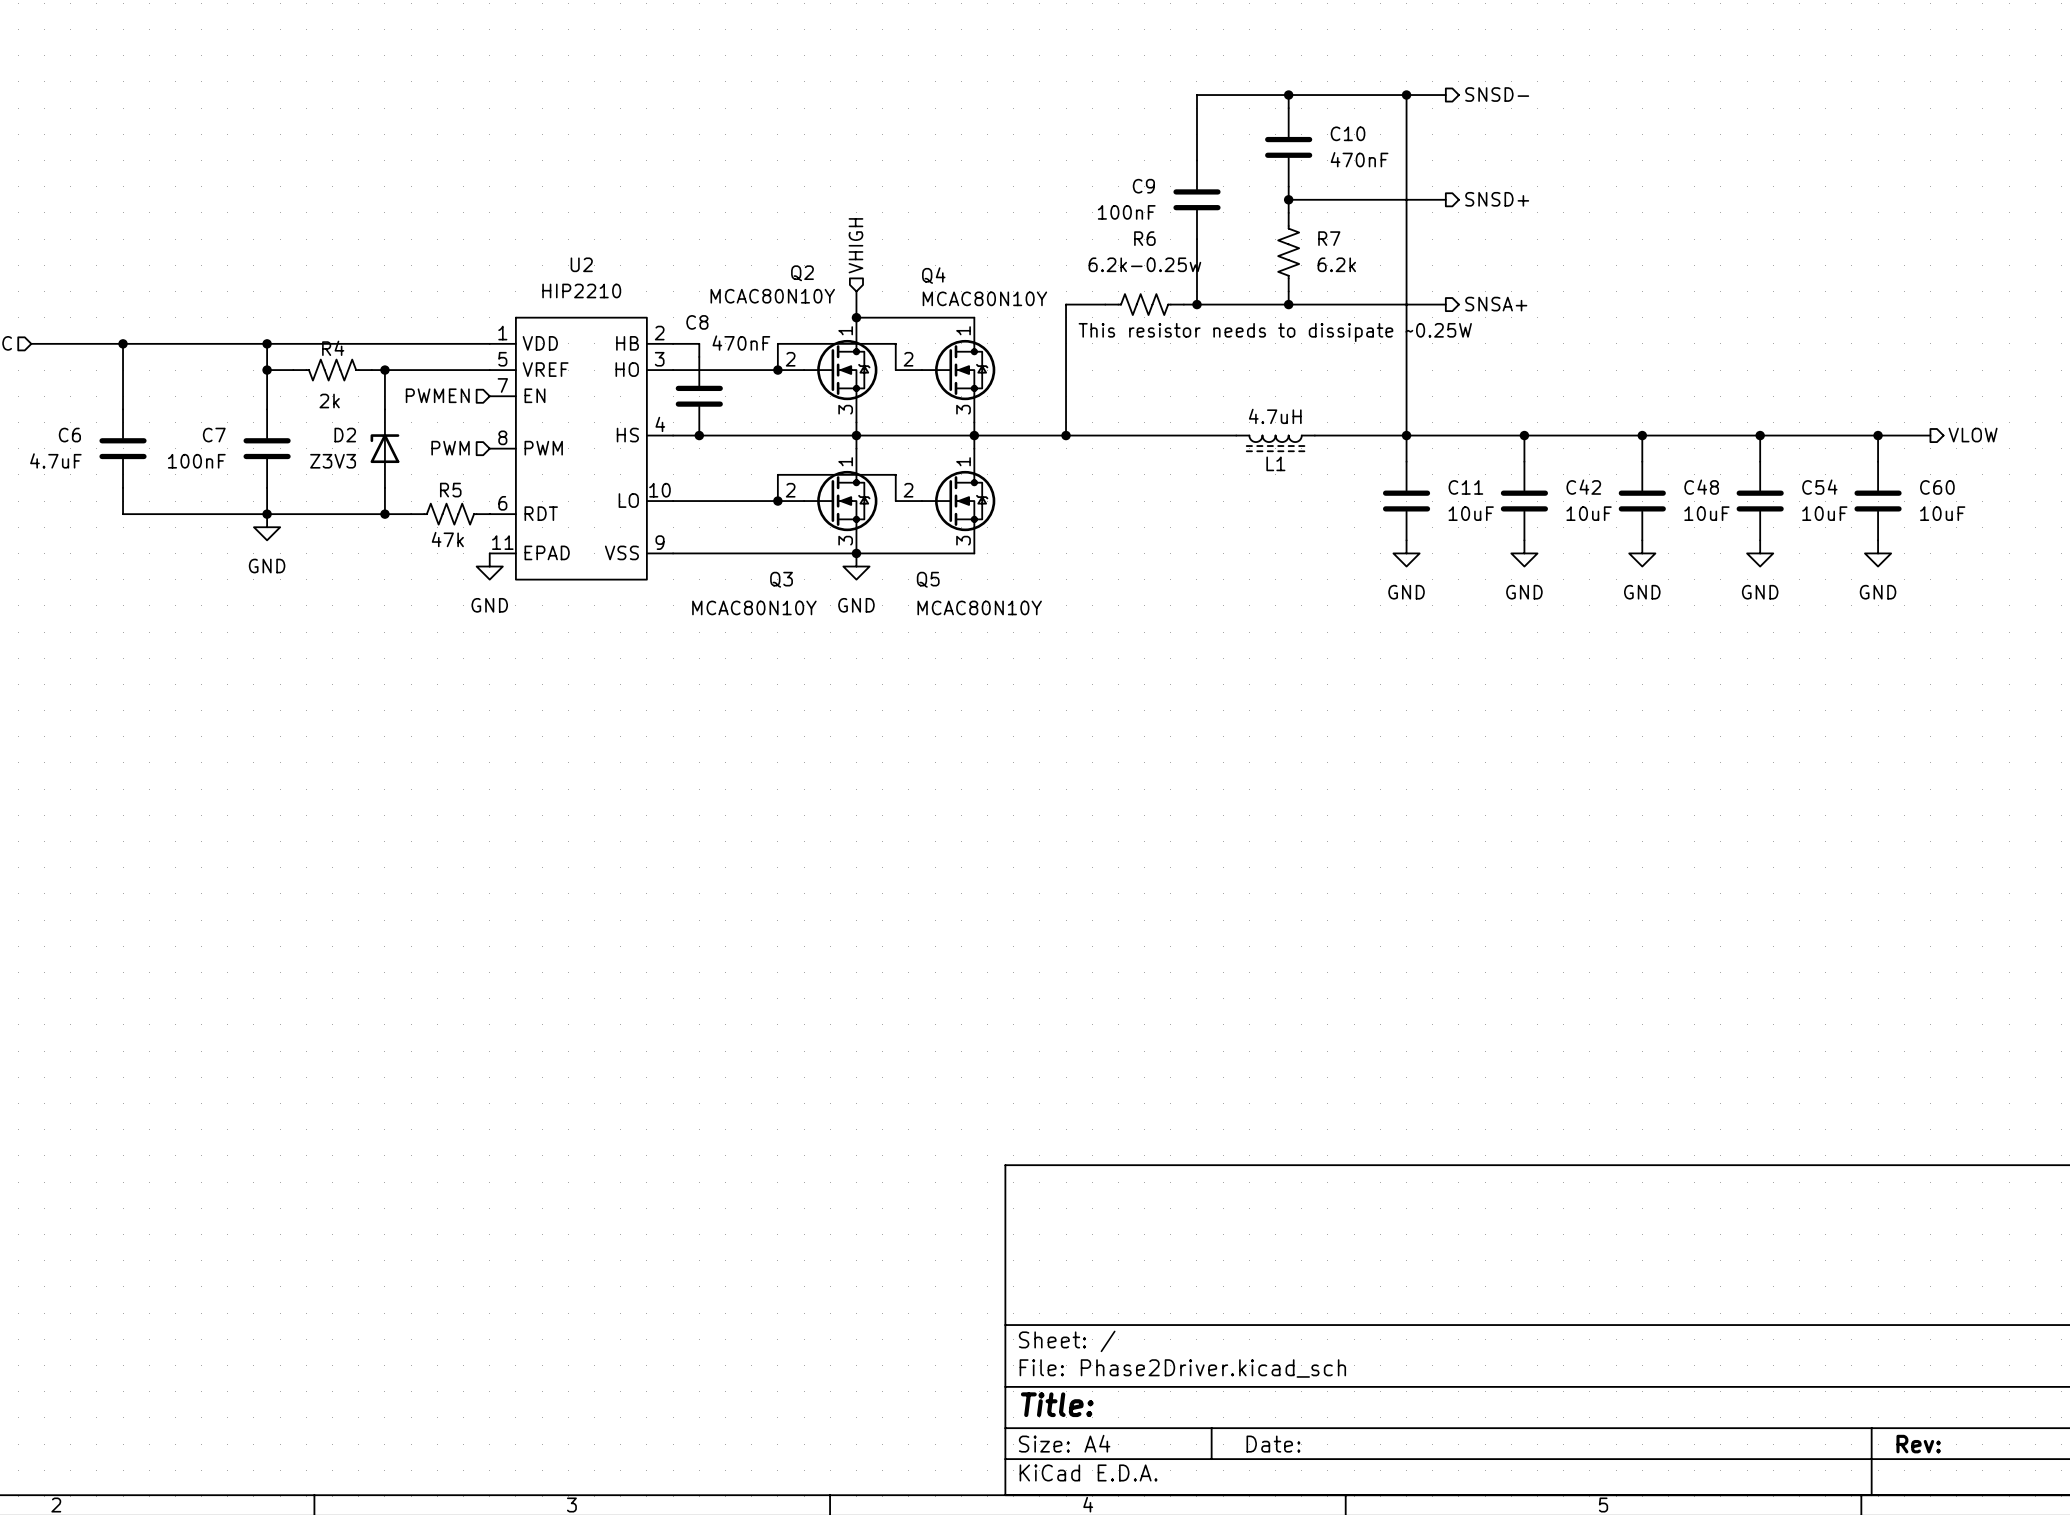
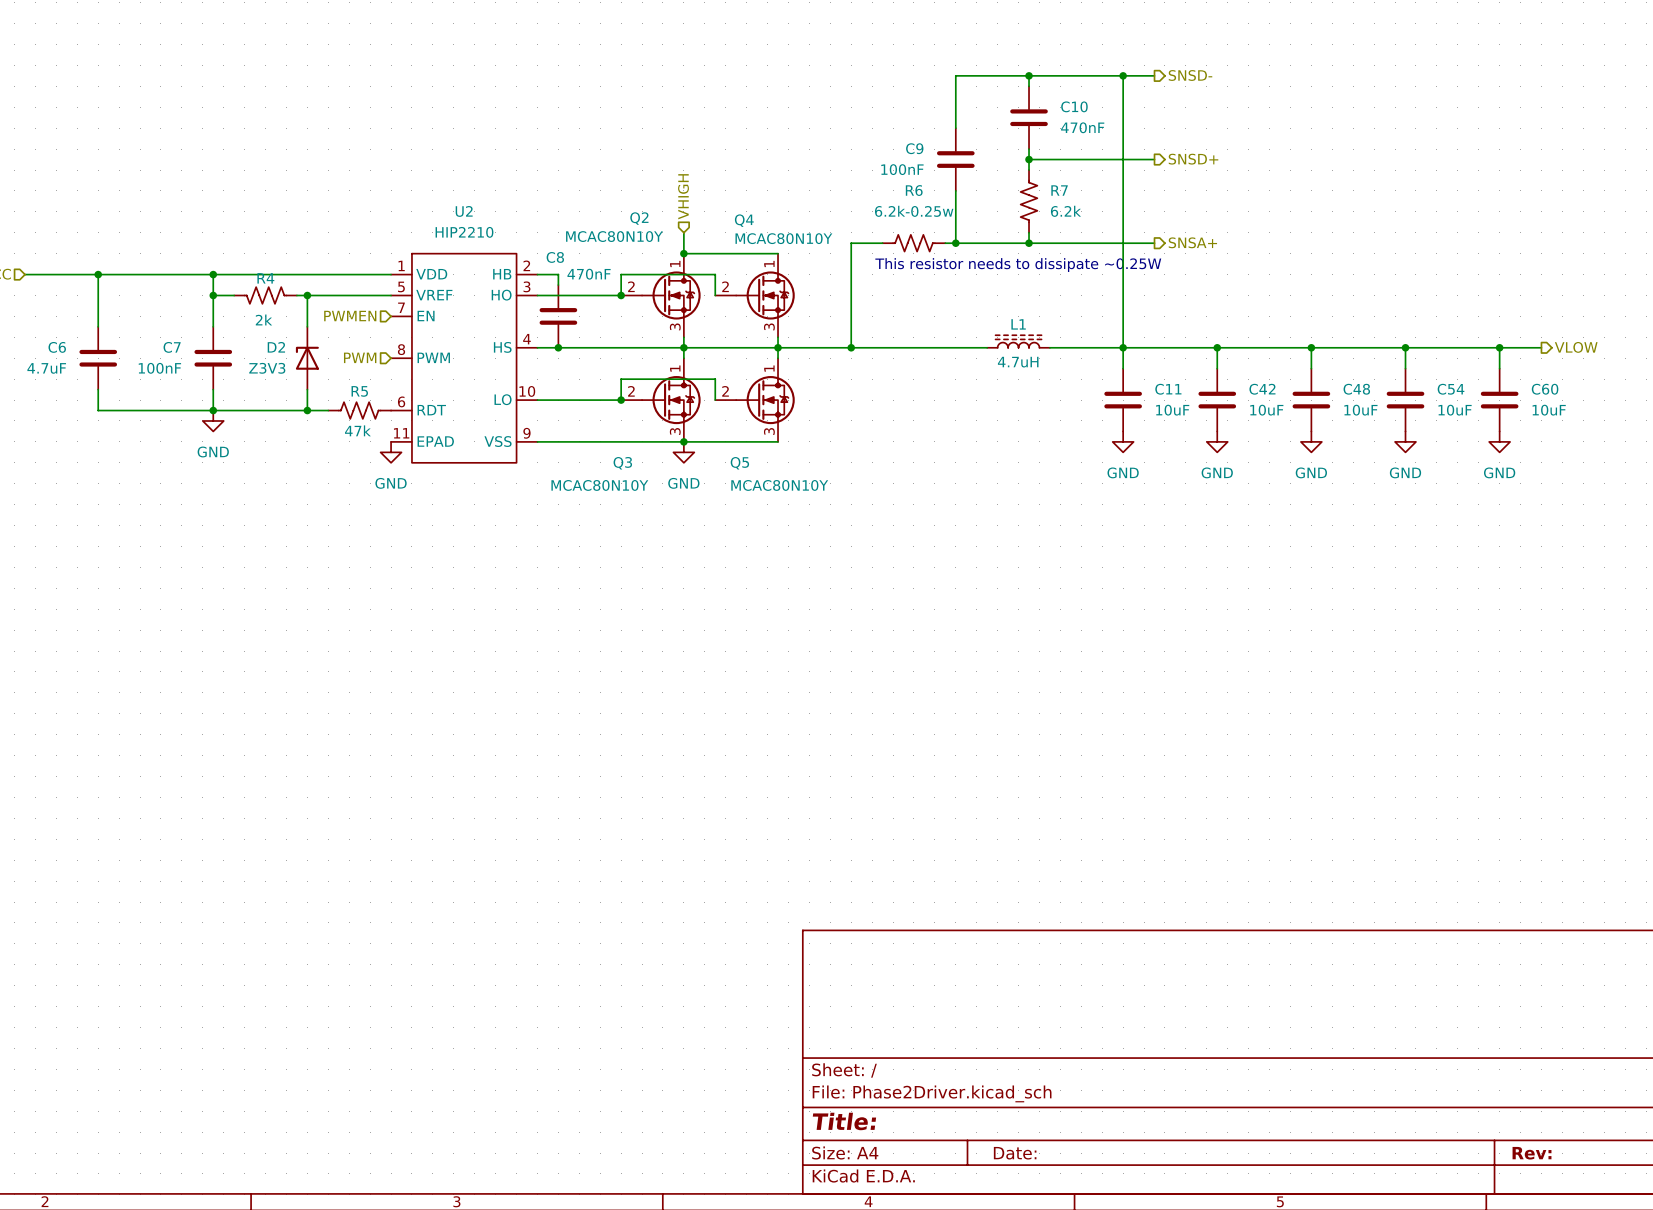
L1 rotation: 0° (1275, 443) -> 180° (1018, 341)

